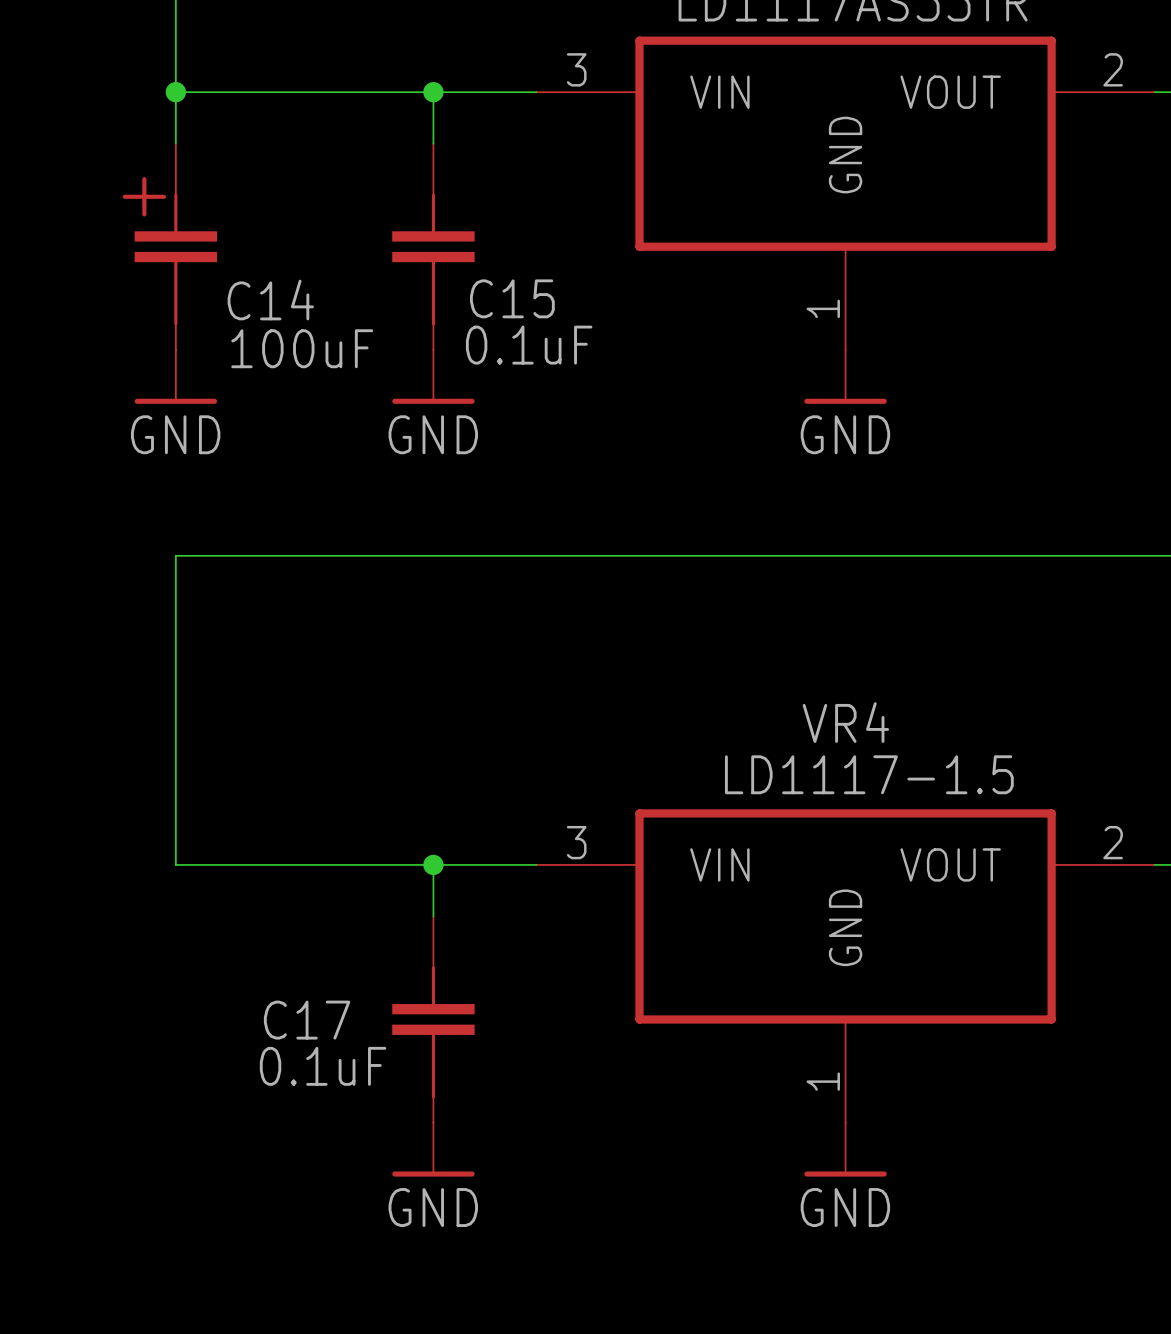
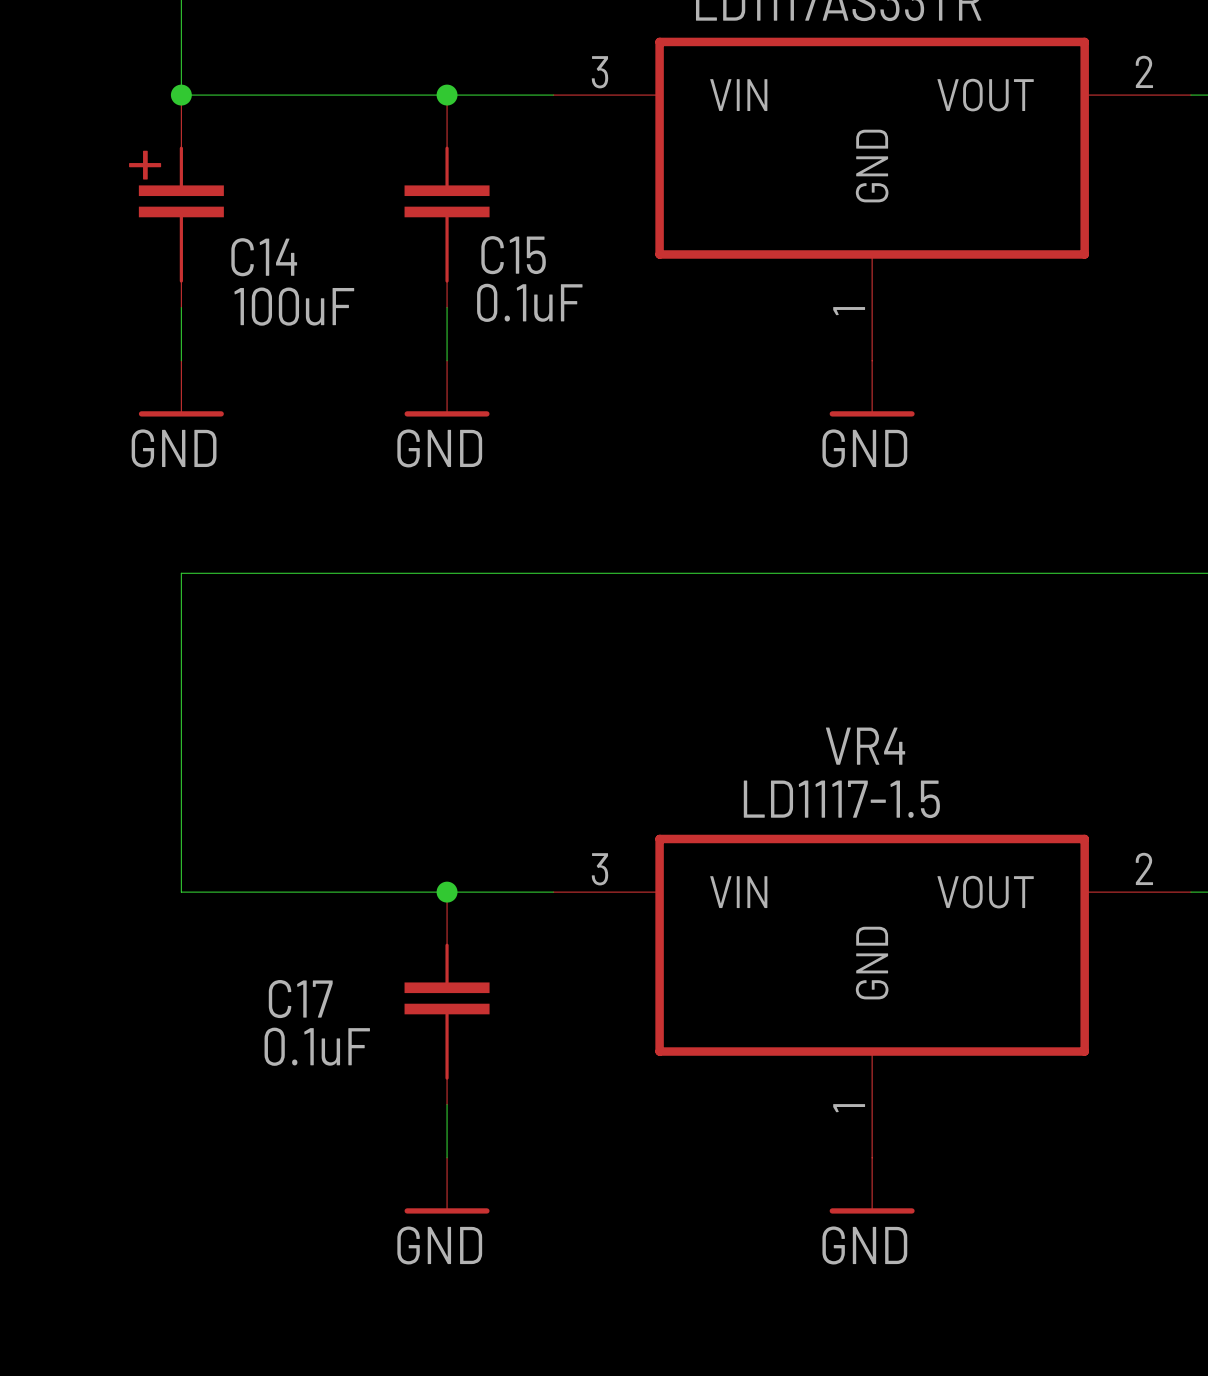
C14 position: (175, 246) -> (181, 201)
C15 position: (433, 246) -> (447, 201)
C17 position: (433, 1019) -> (447, 998)

